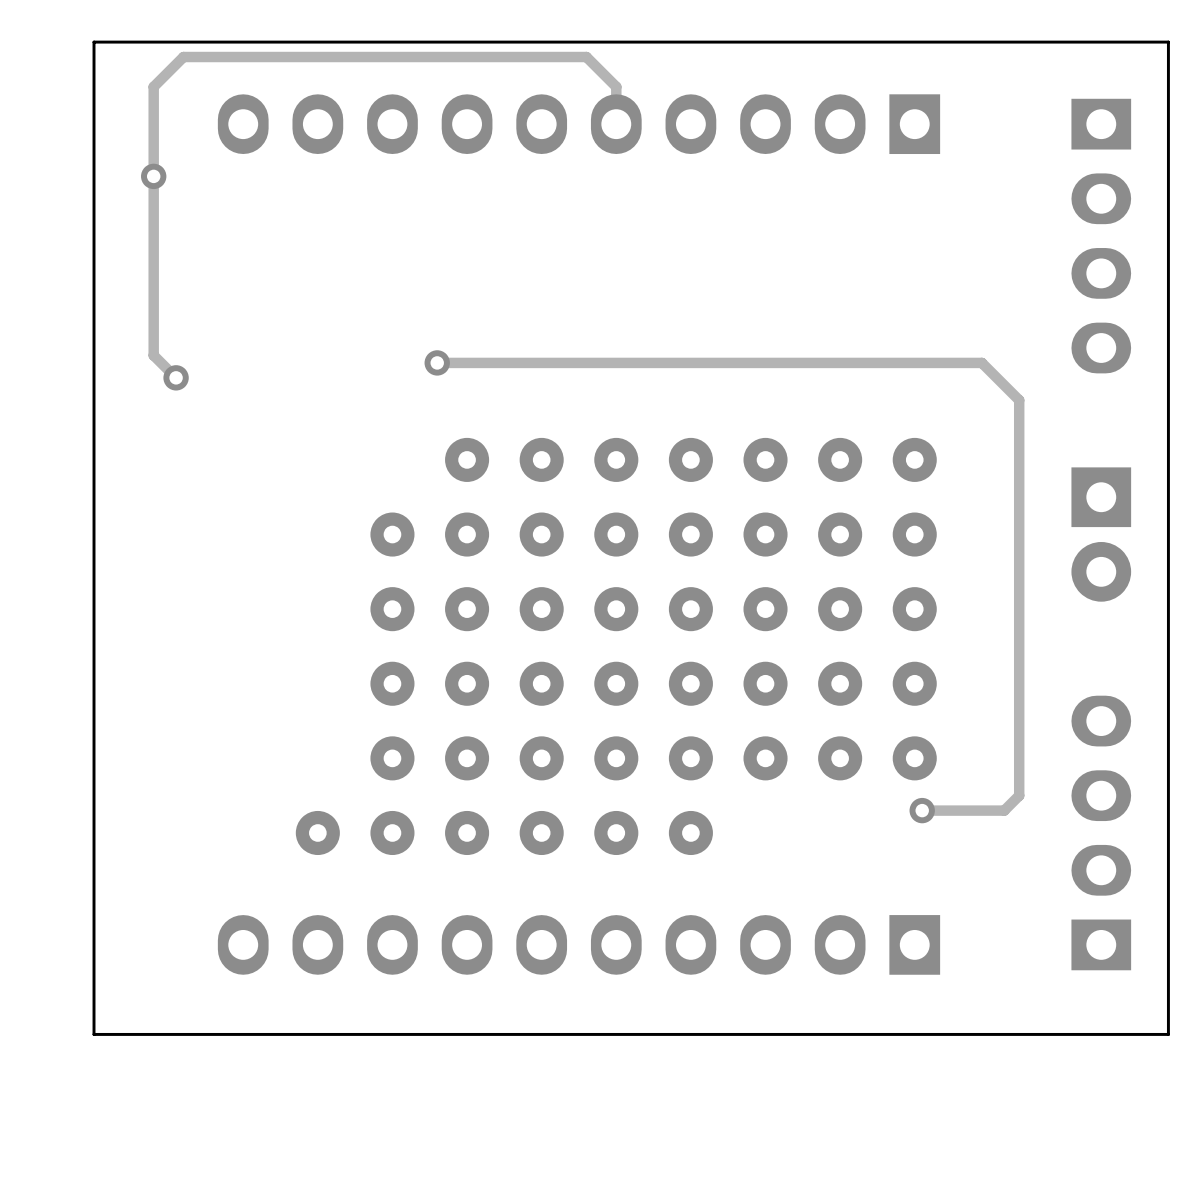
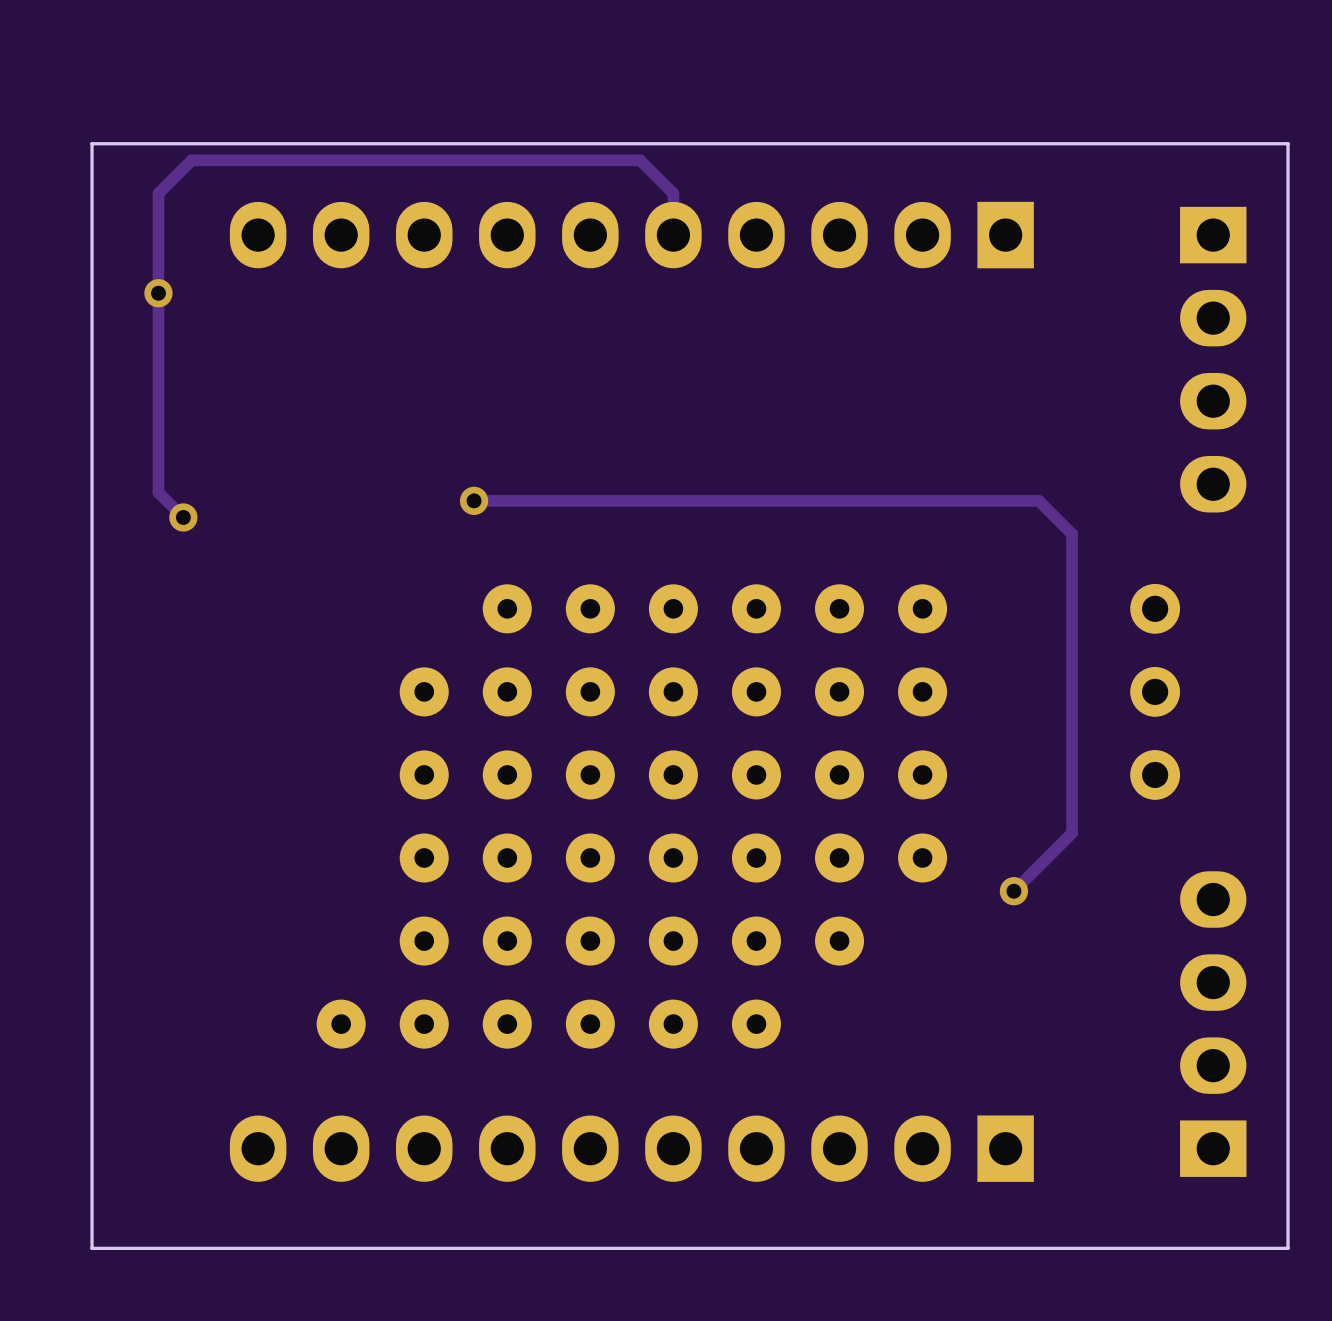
track: (944, 362) (981, 362) (1019, 400) (1019, 795) (1004, 810) (922, 810) -> (1038, 500) (1072, 534) (1072, 833) (1013, 891)
part: (914, 459) -> none
part: (914, 534) -> none
part: none -> (1155, 691)
part: (1101, 534) -> none
part: (914, 609) -> none
part: (914, 683) -> none
part: (840, 758) -> none
part: (914, 758) -> none
via position: (922, 810) -> (1013, 891)

